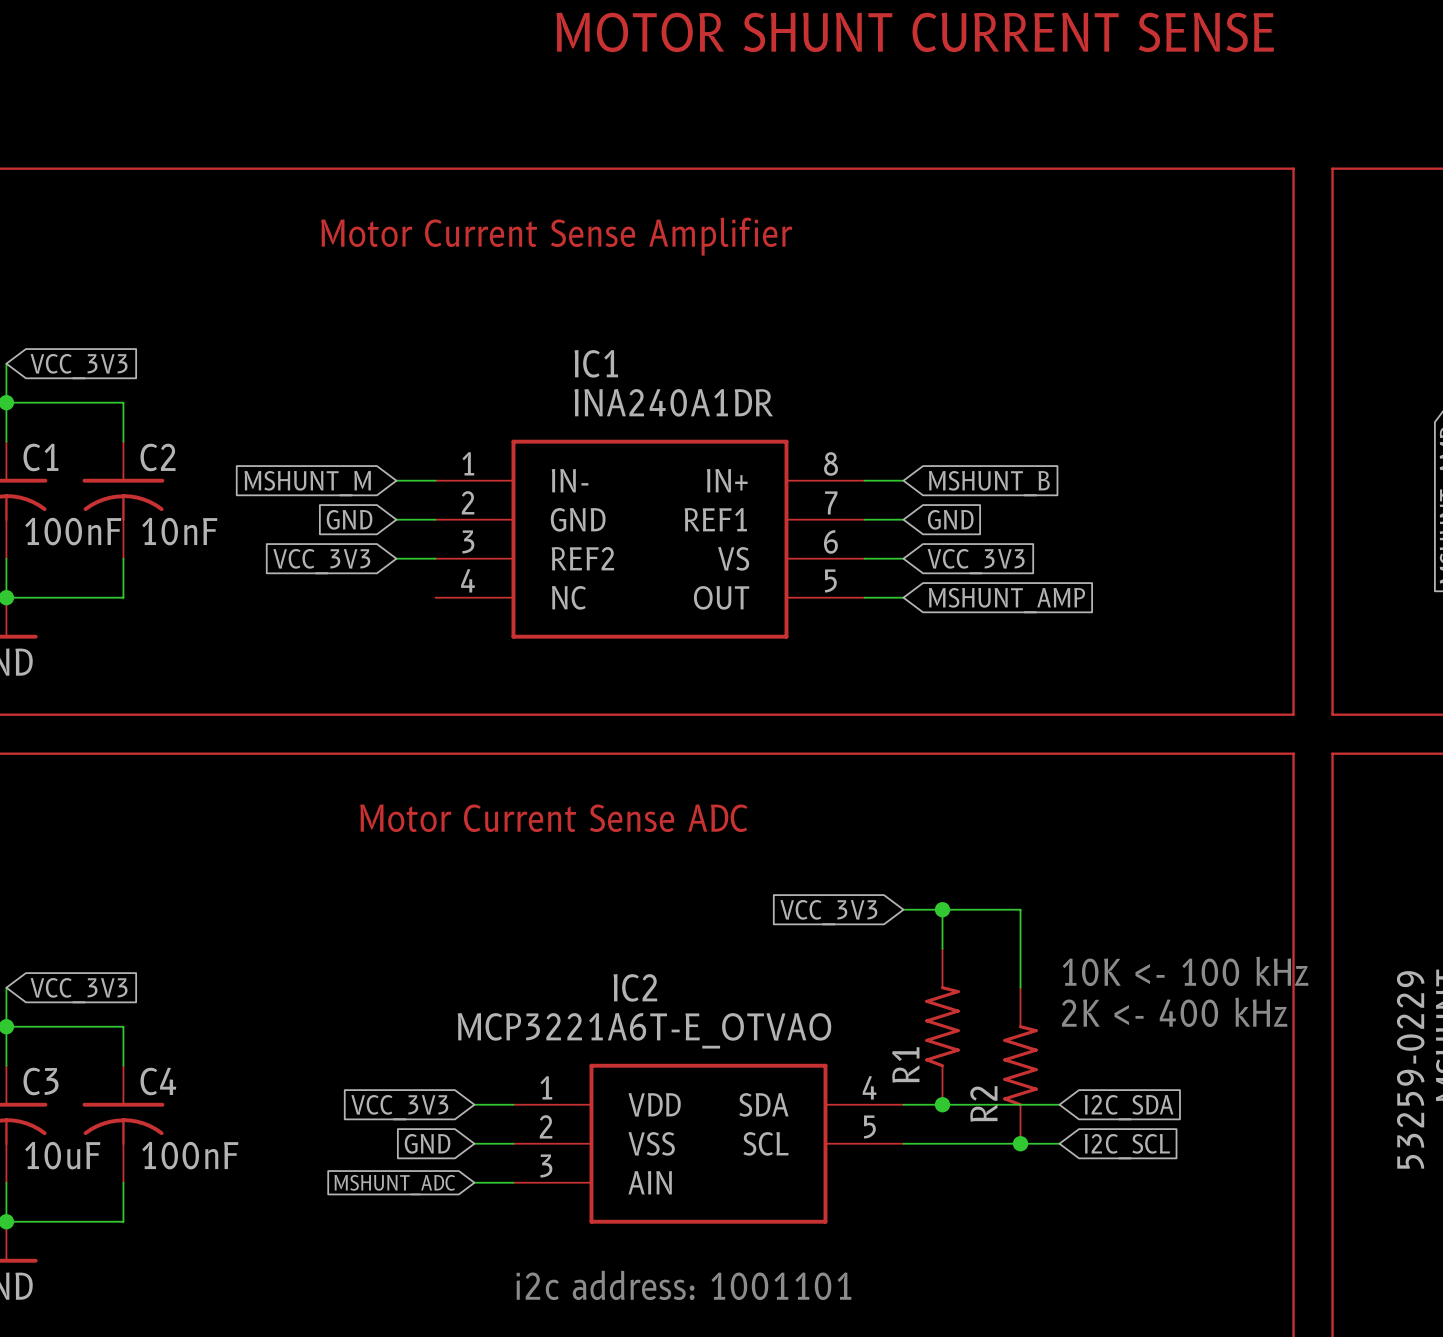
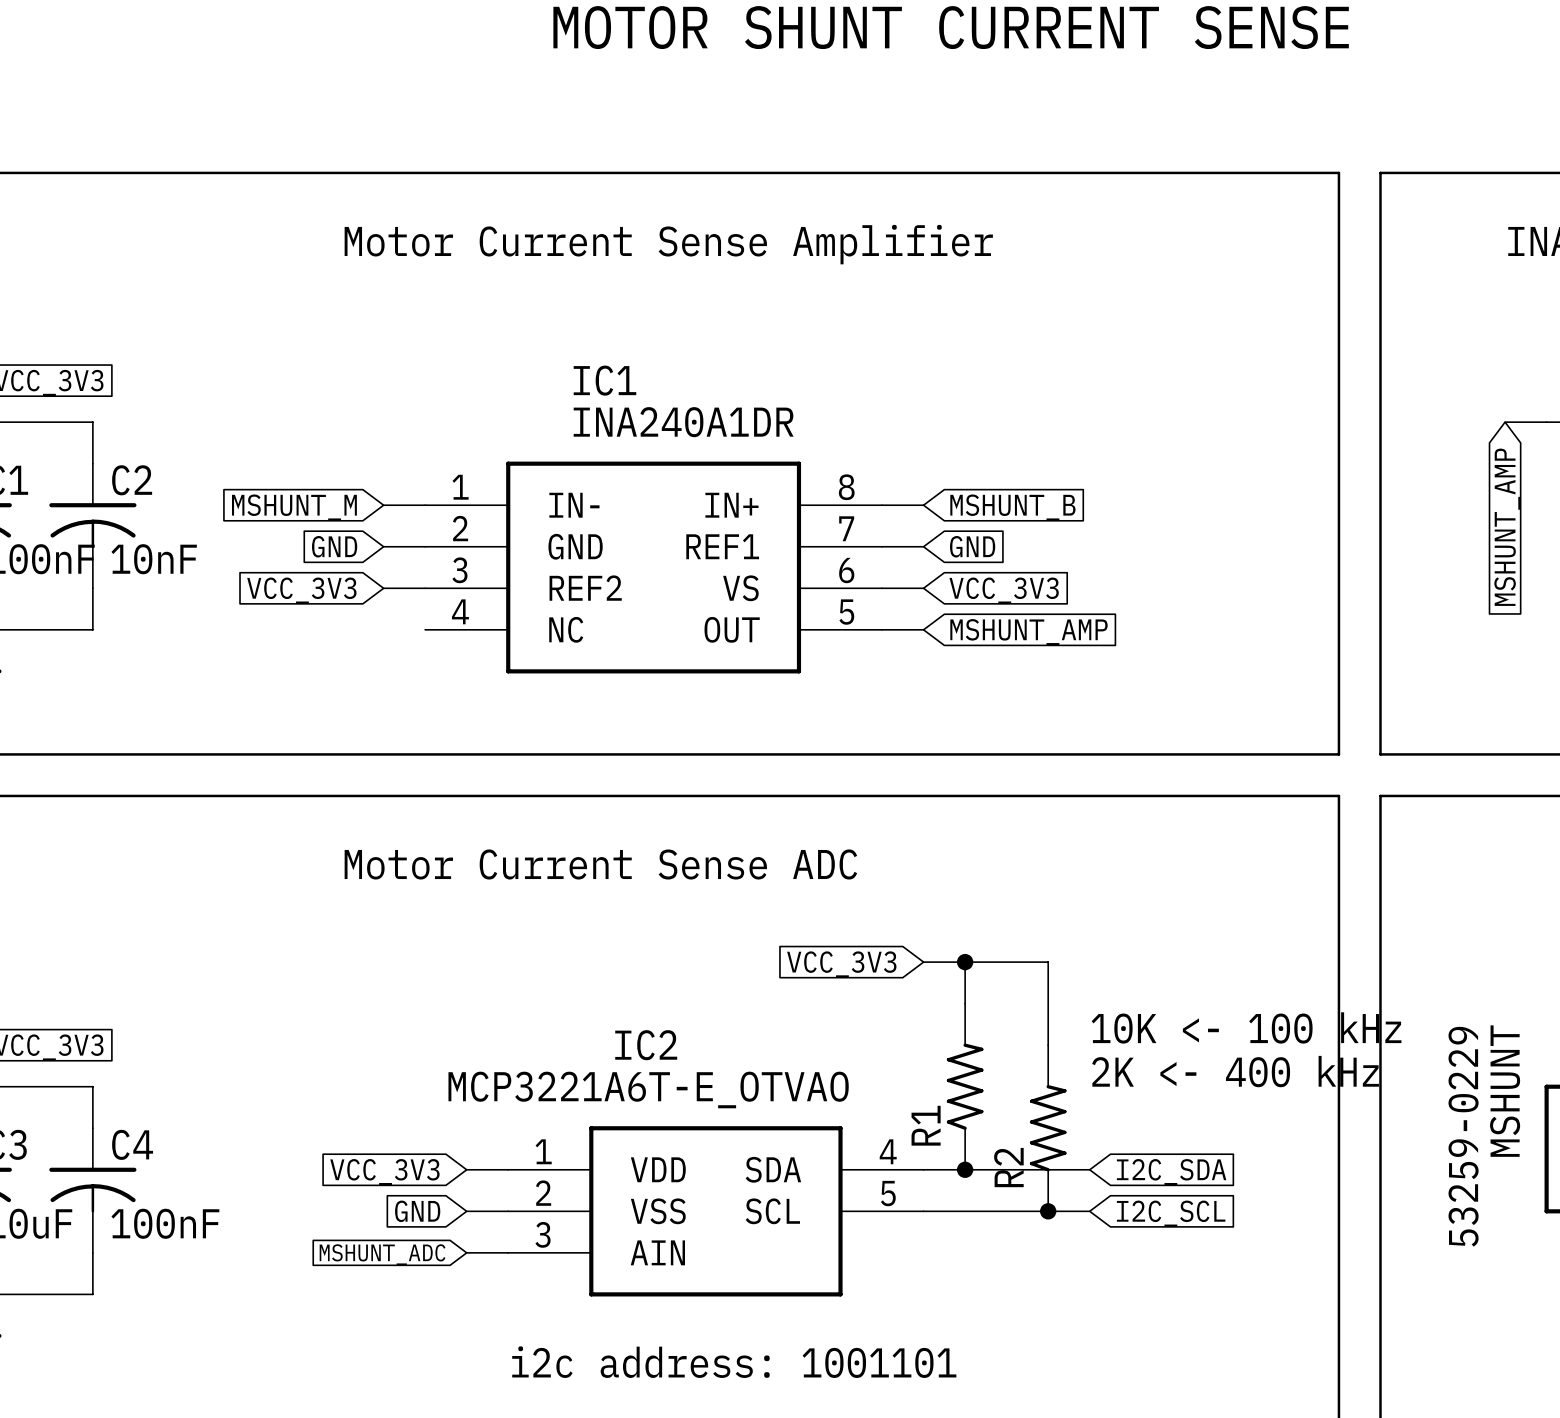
text position: Motor Current Sense Amplifier (556, 236) -> Motor Current Sense Amplifier (668, 244)

